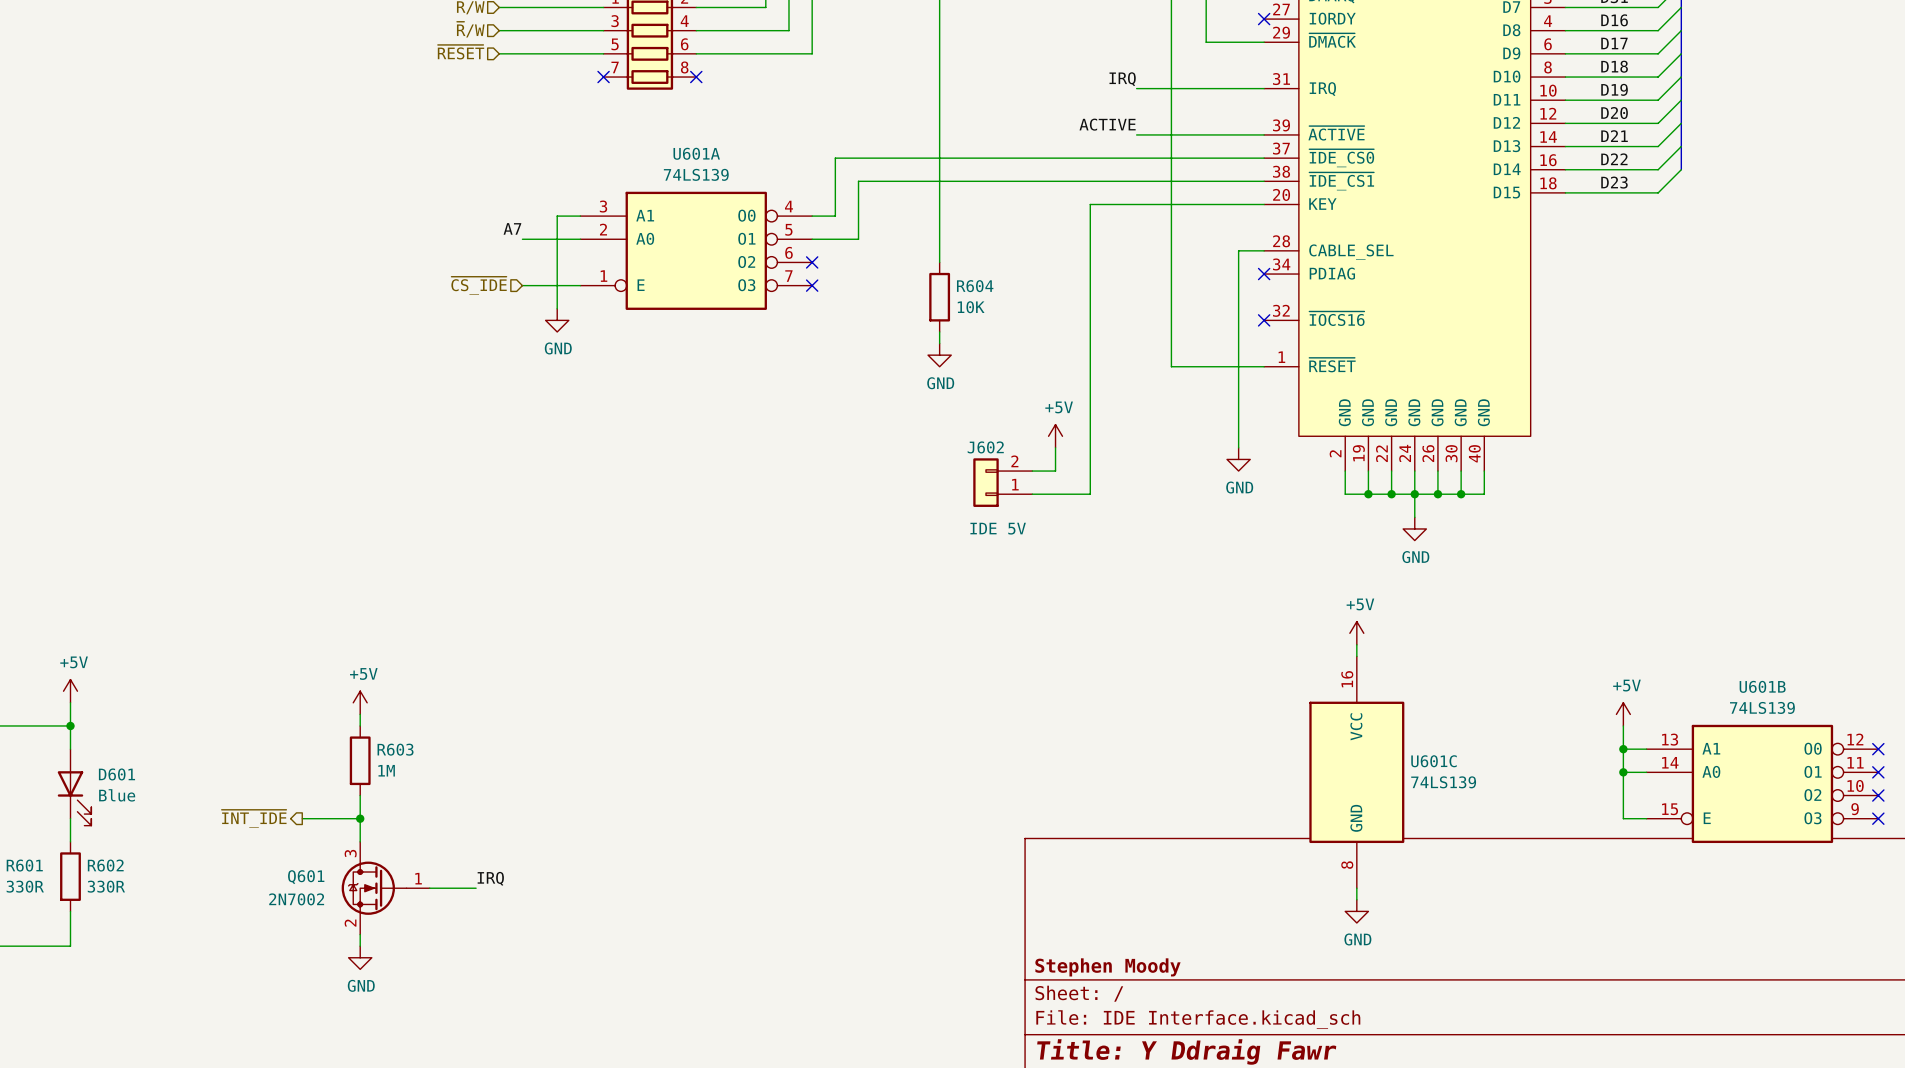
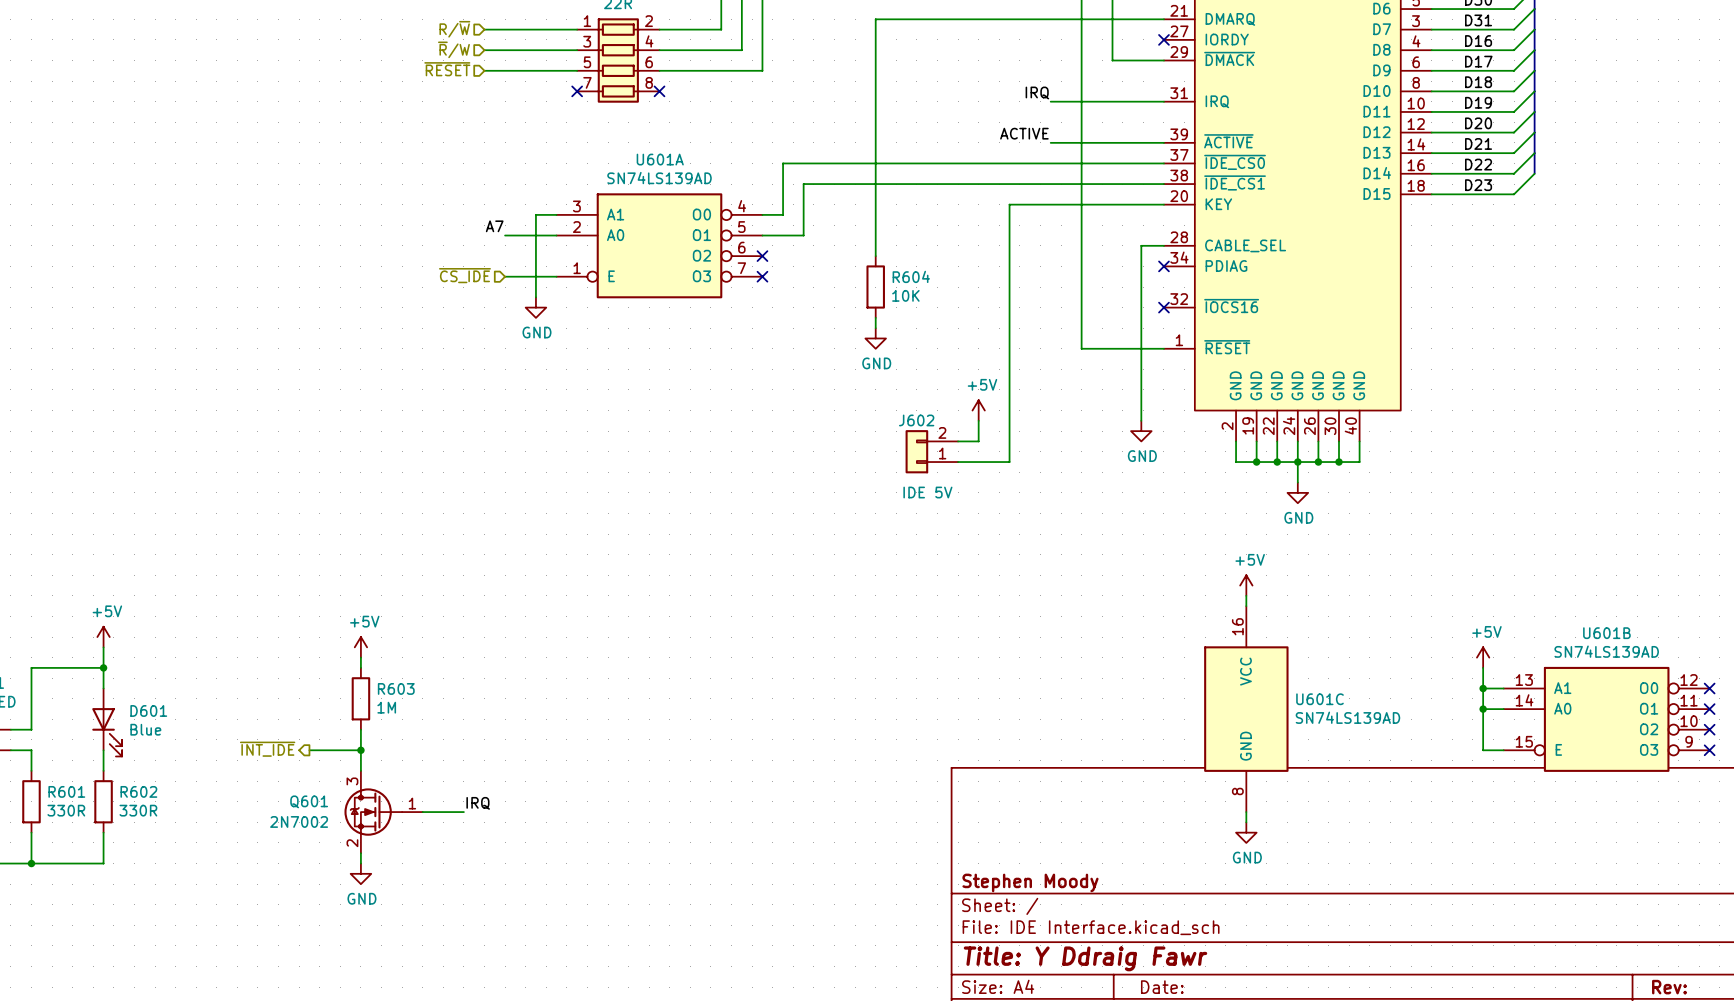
U601A value: 74LS139 (696, 174) -> SN74LS139AD (659, 178)
U601B value: 74LS139 (1762, 707) -> SN74LS139AD (1606, 651)
U601C value: 74LS139 (1443, 782) -> SN74LS139AD (1347, 717)

